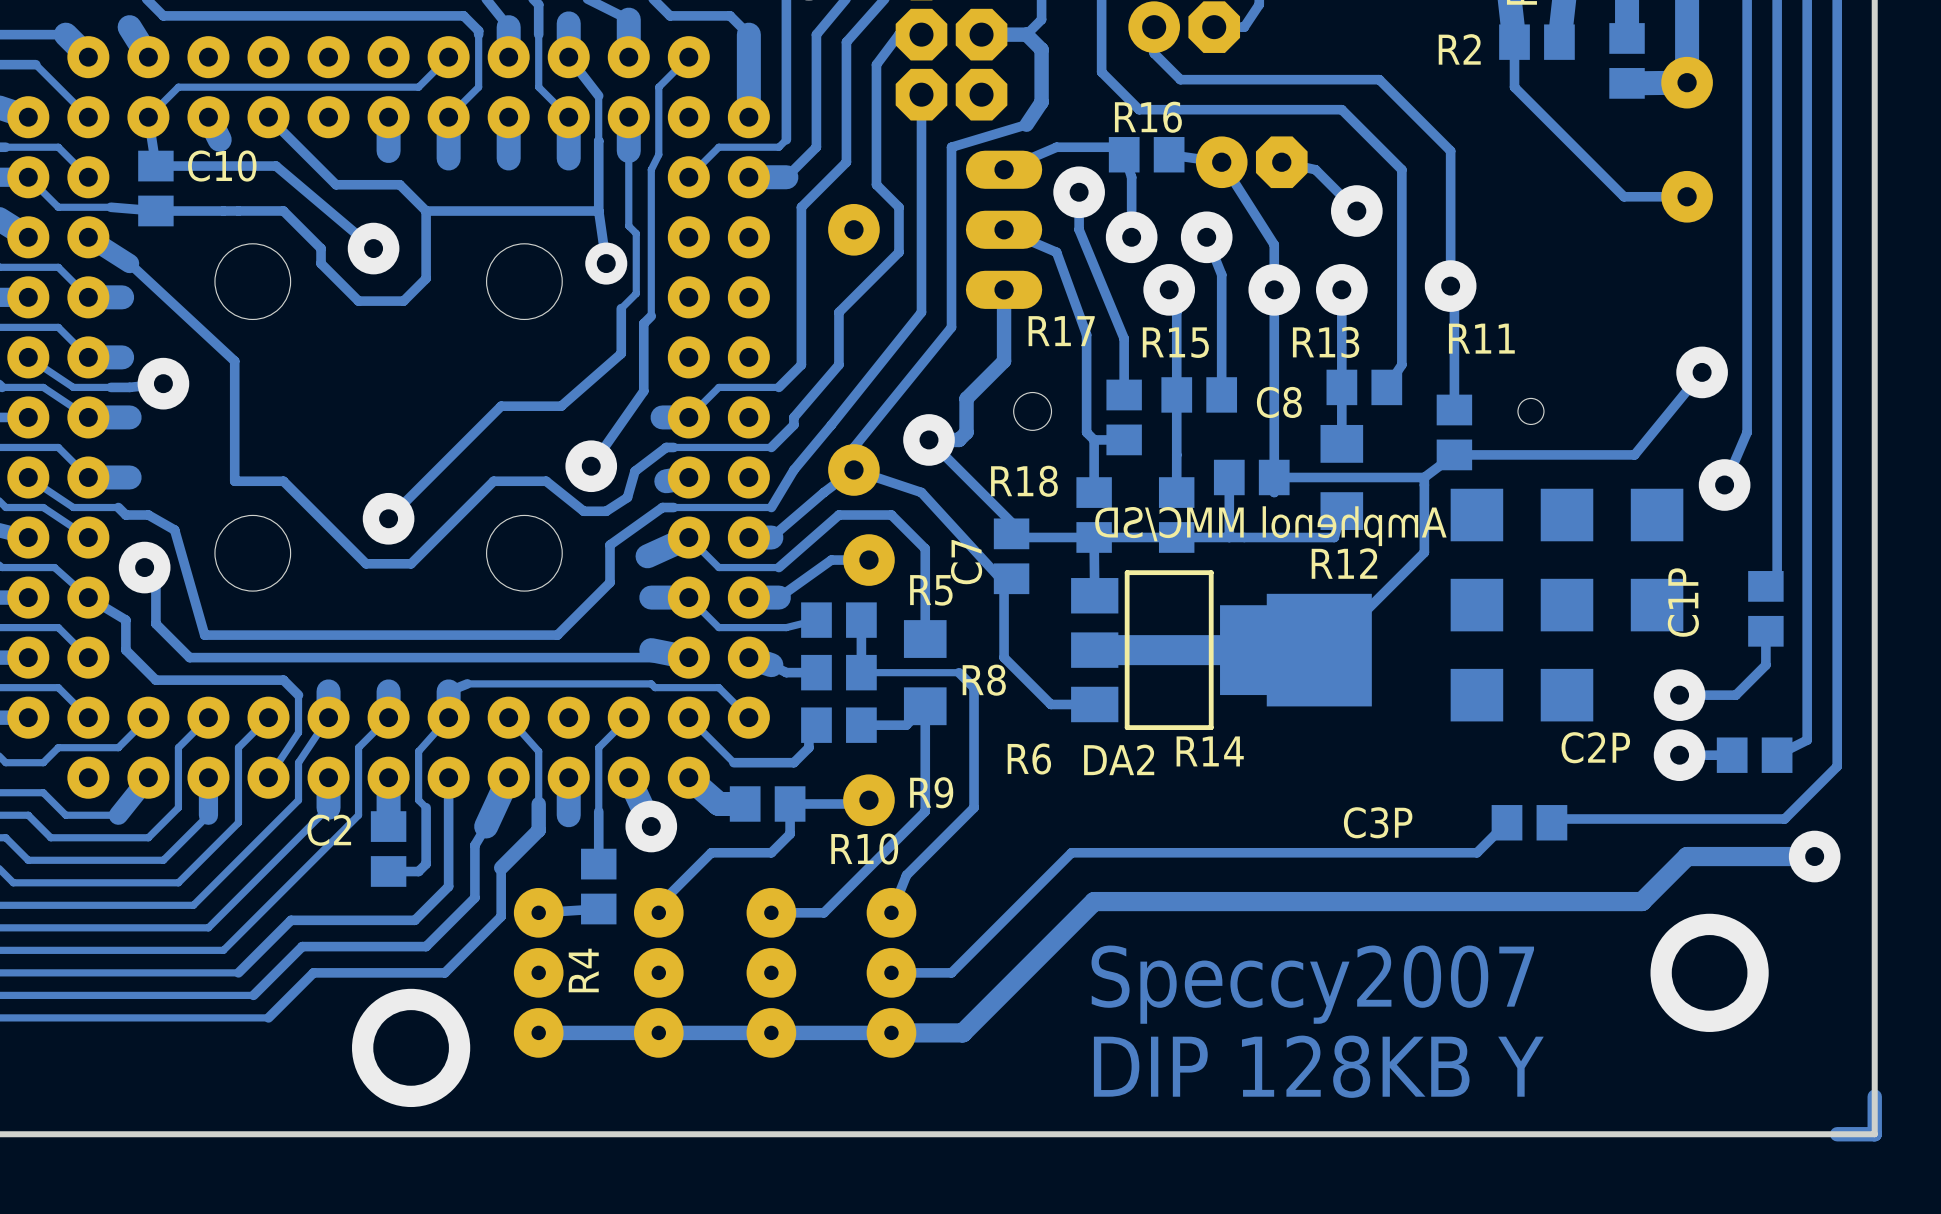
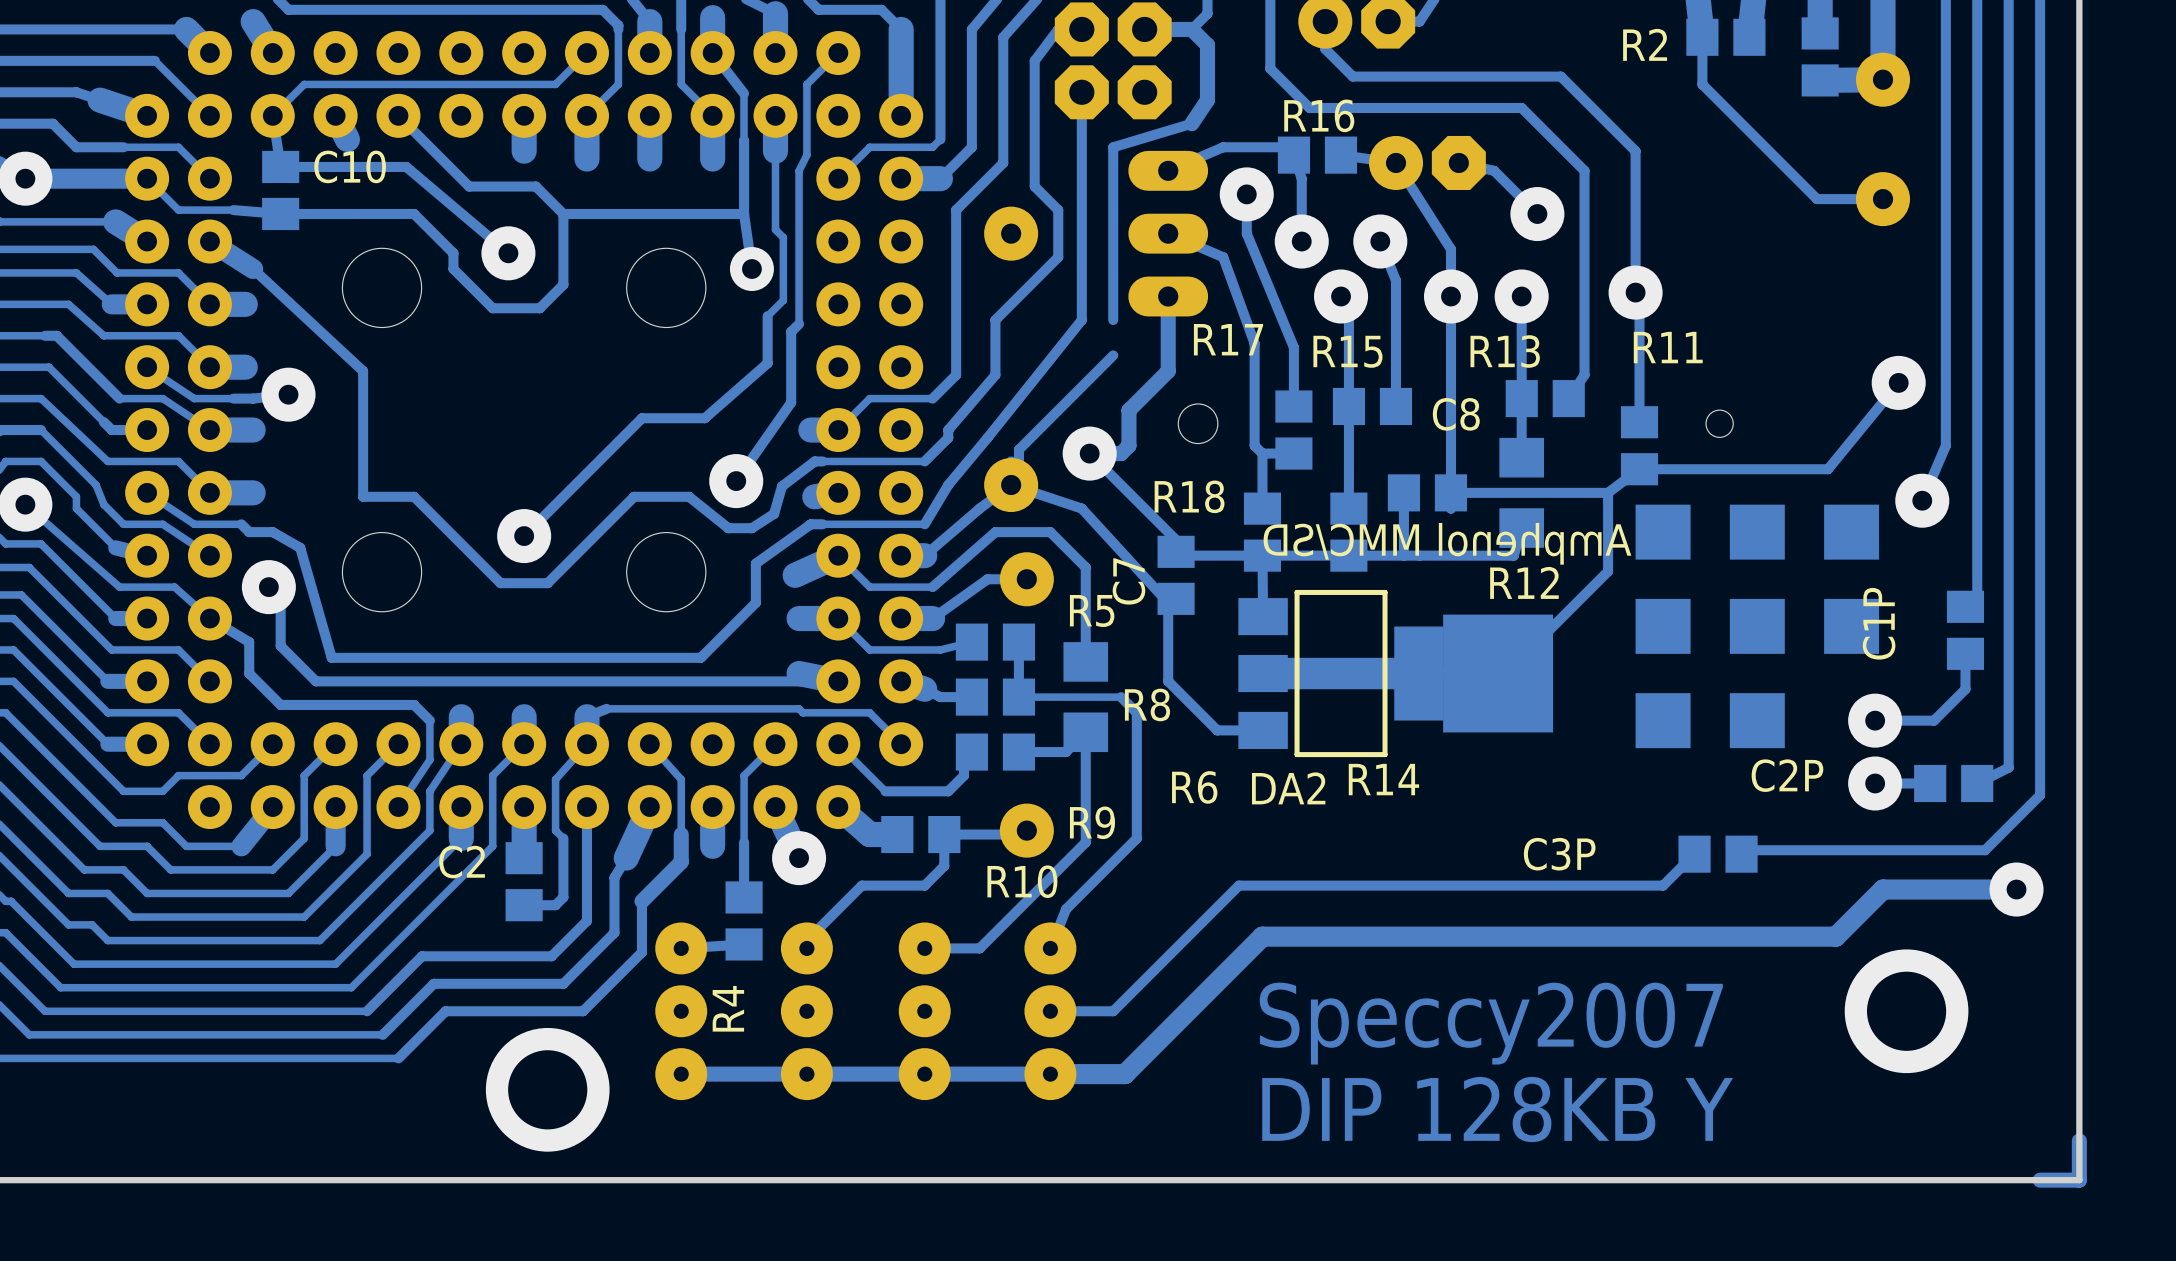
track: (951, 312) (951, 327) (853, 447) -> none
track: none -> (1113, 355) (1018, 449) (1018, 481)

